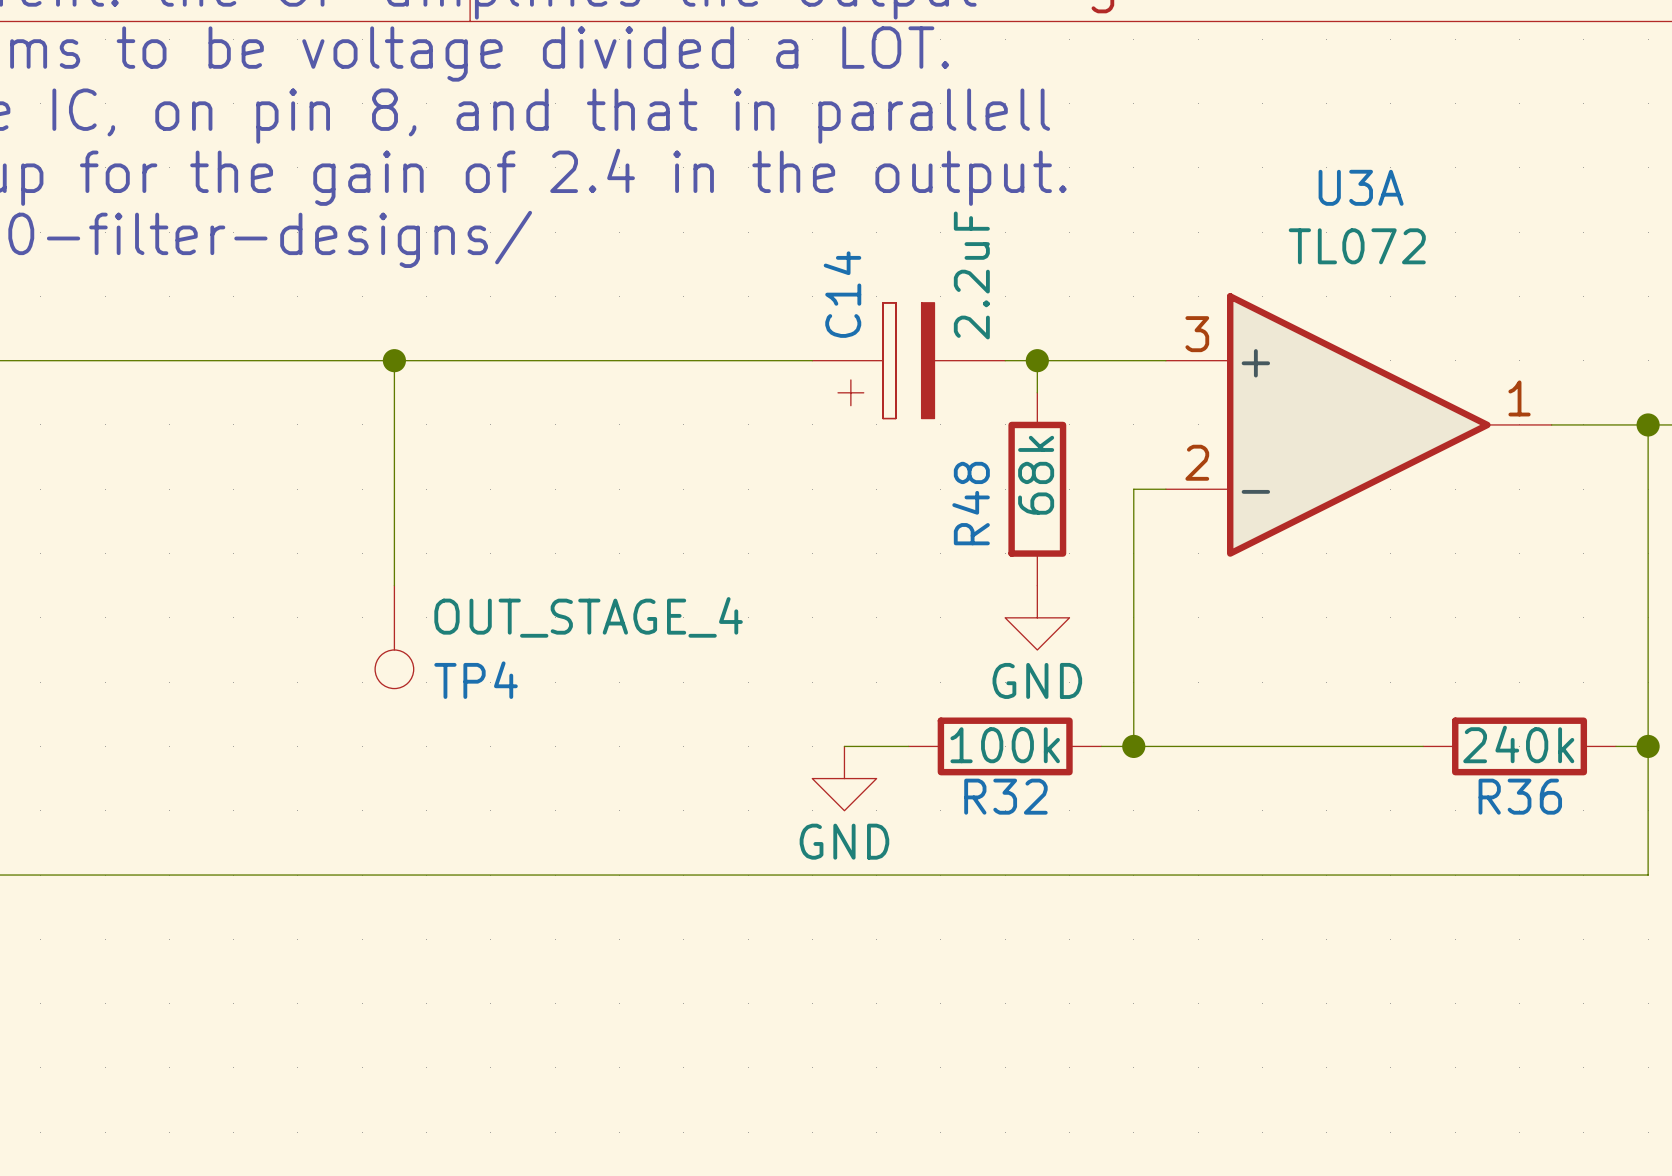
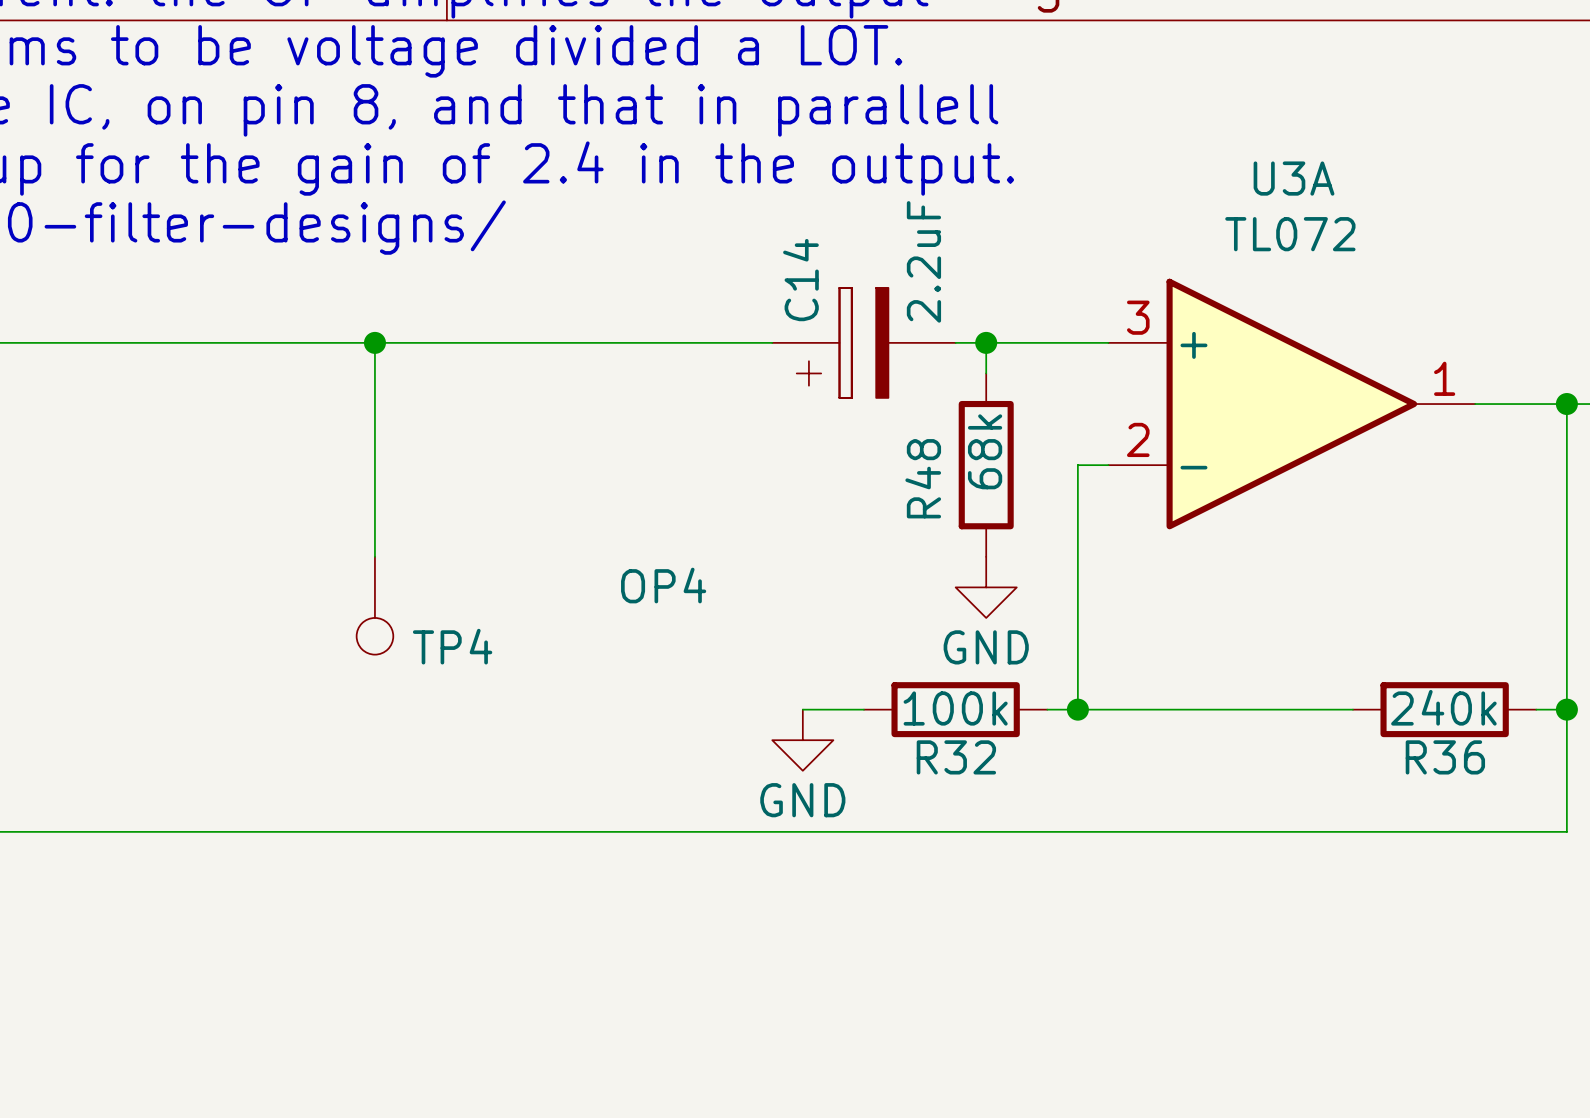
TP4 value: OUT_STAGE_4 (588, 617) -> OP4 (663, 585)

